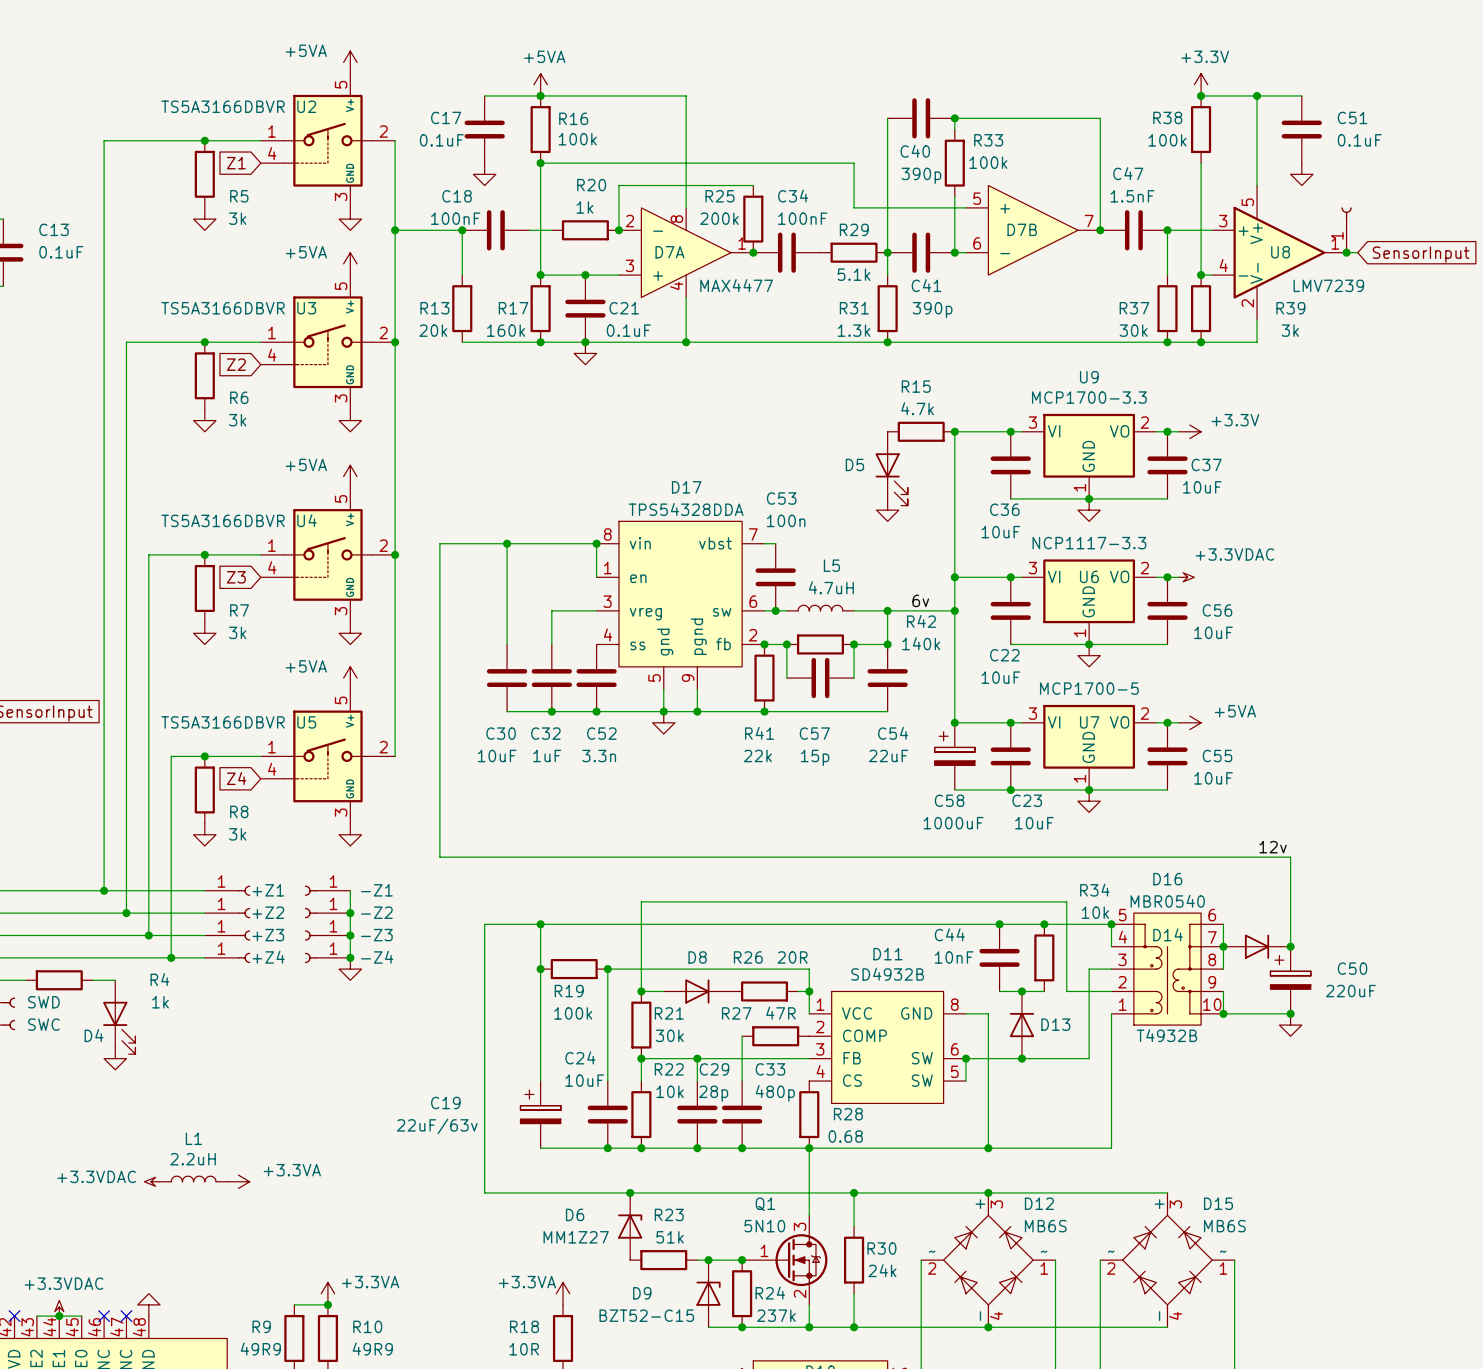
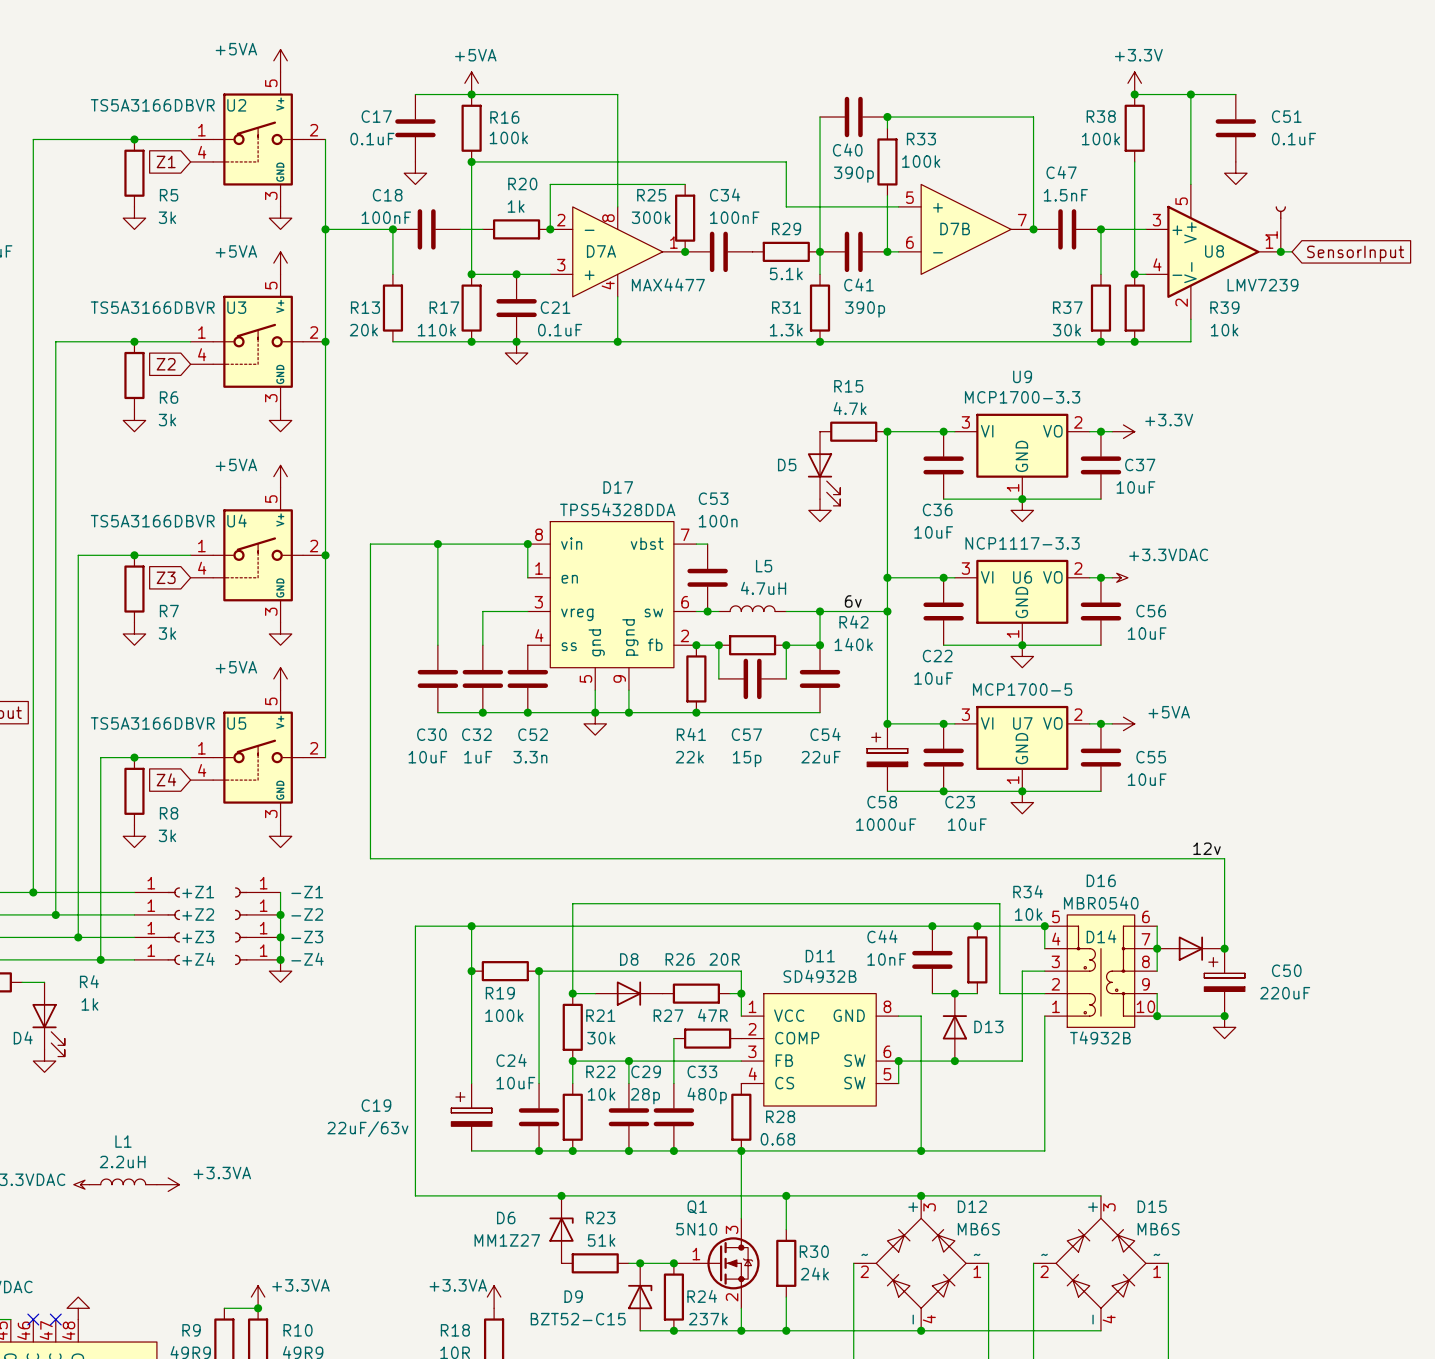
R25 value: 200k (719, 218) -> 300k (651, 217)
R17 value: 160k (506, 330) -> 110k (436, 330)
R39 value: 3k (1290, 330) -> 10k (1224, 330)

